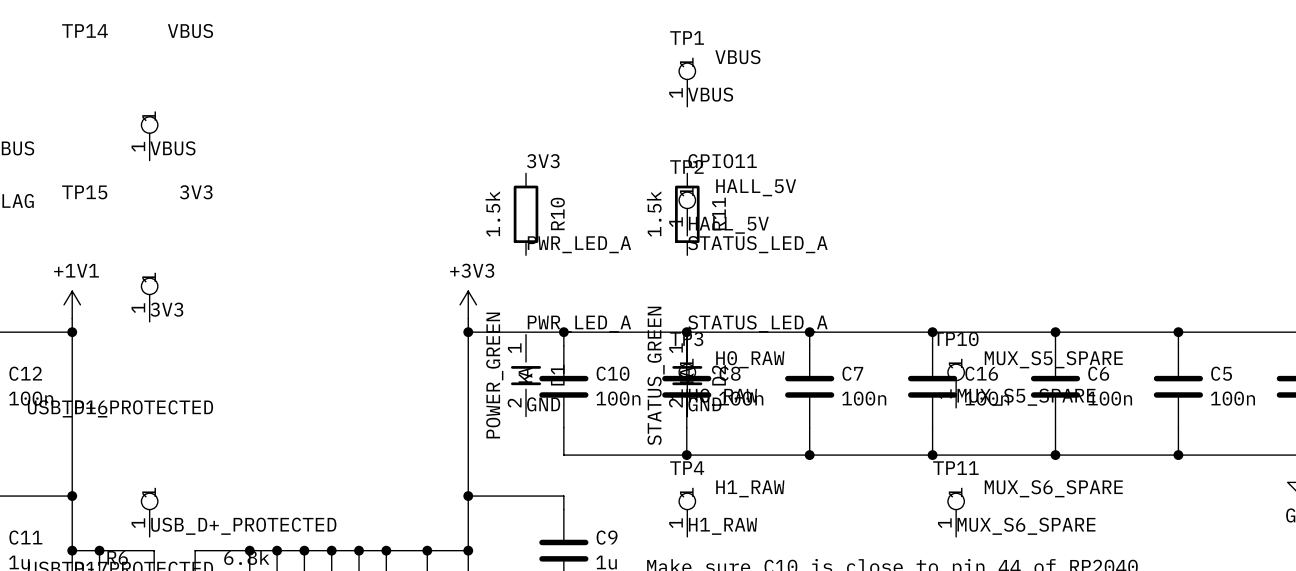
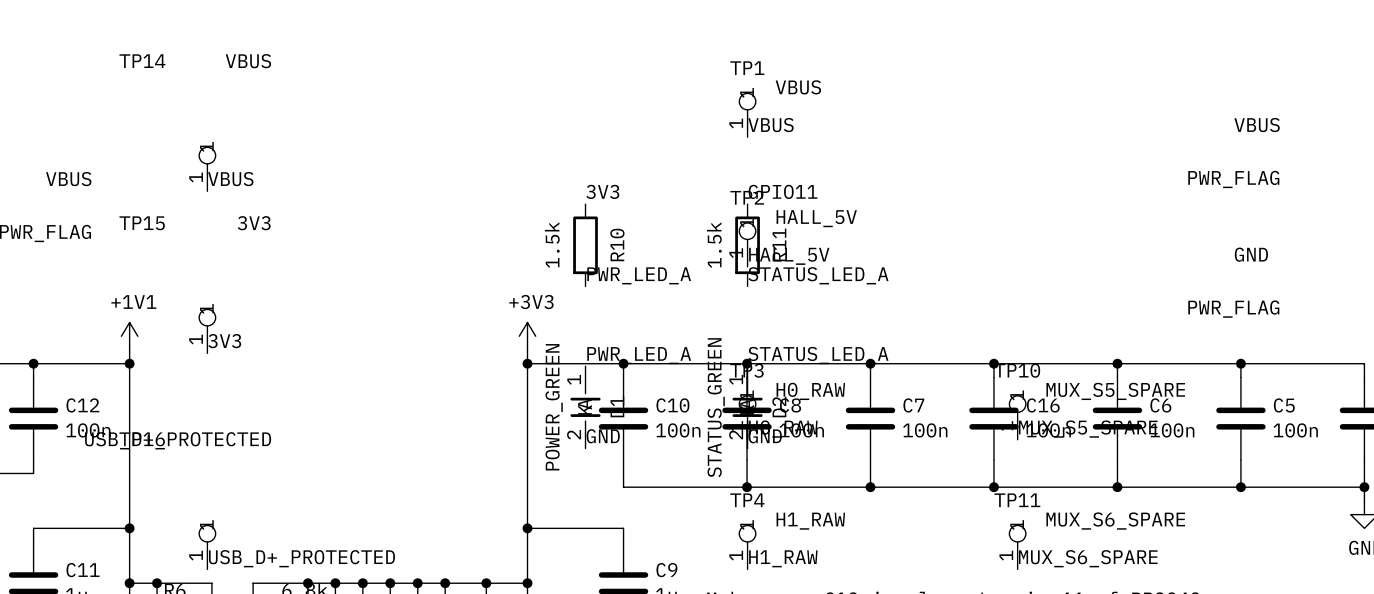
label: none -> VBUS (1257, 125)
power symbol: none -> PWR_FLAG (1233, 179)
label: none -> GND (1251, 254)
power symbol: none -> PWR_FLAG (1233, 309)

